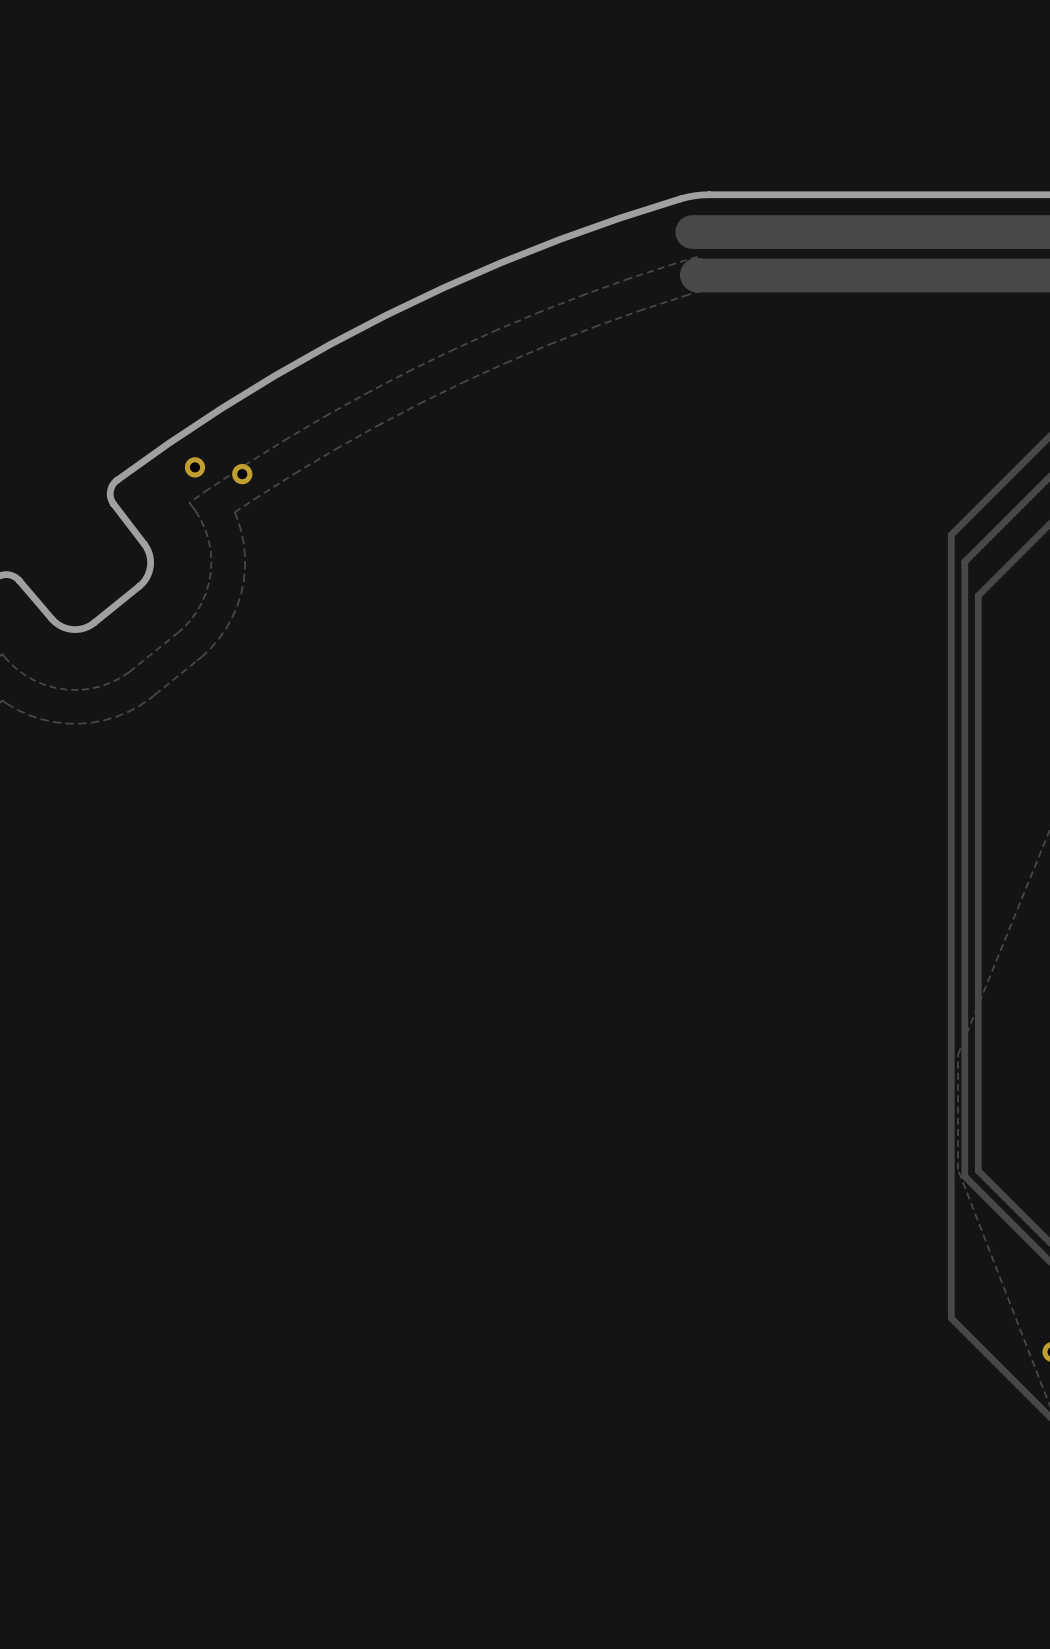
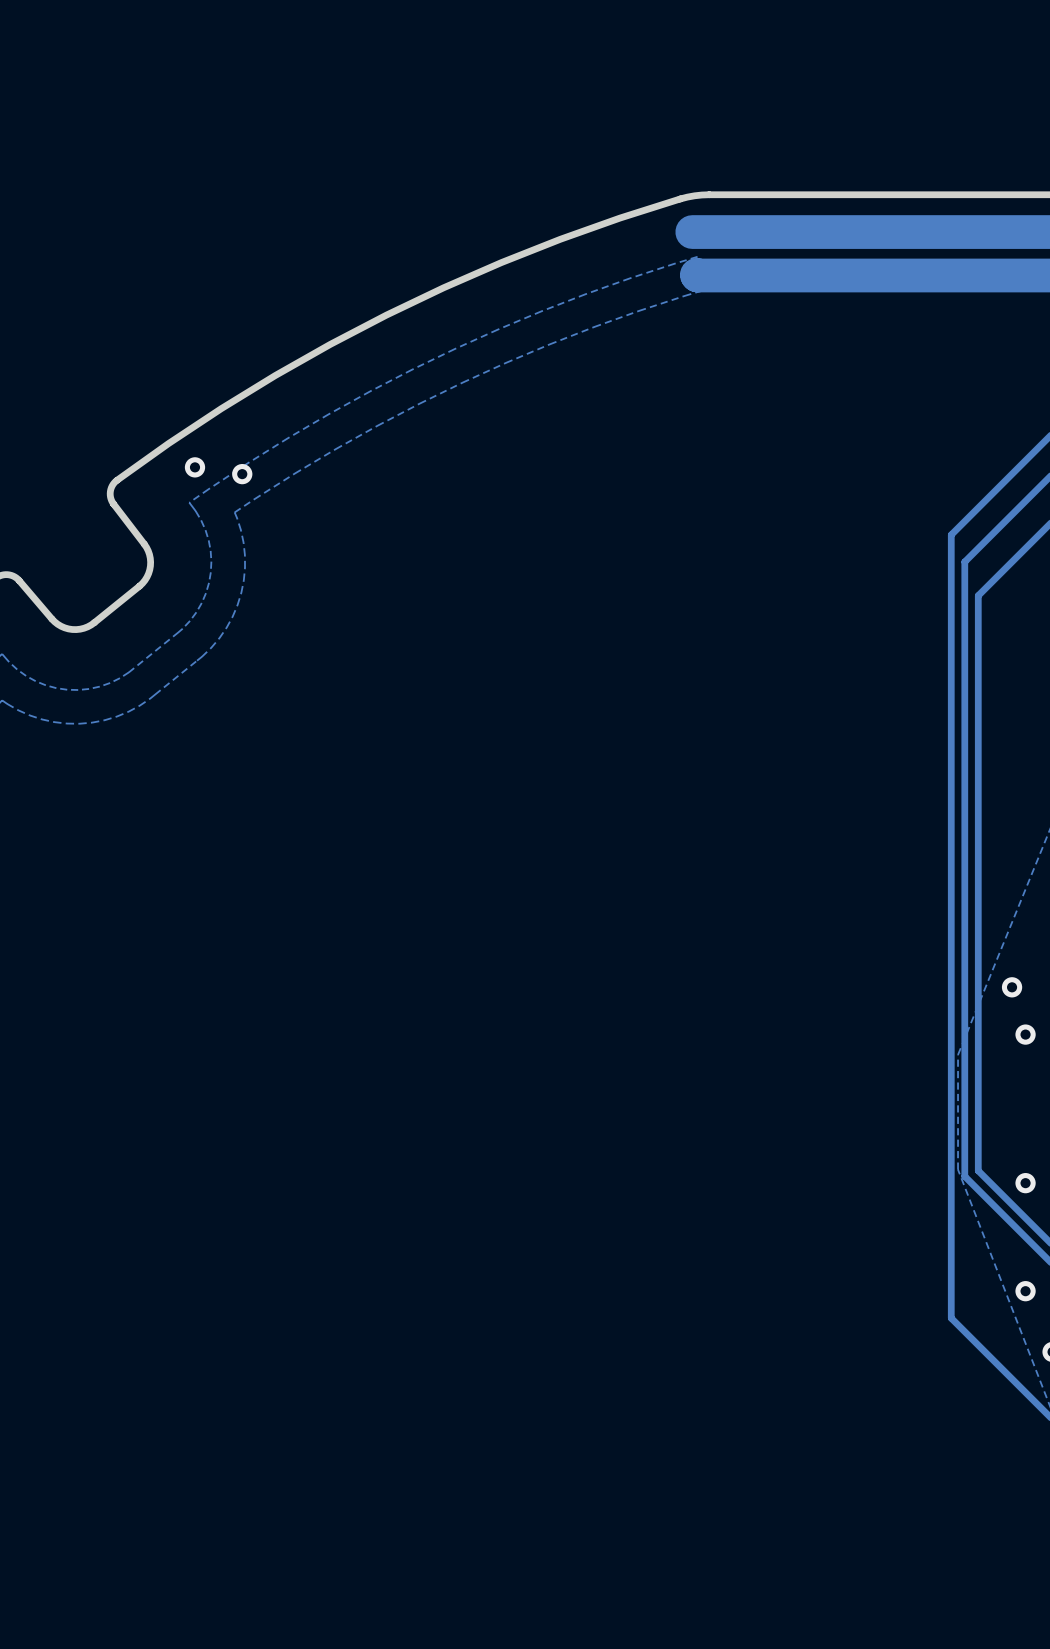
via: none -> (1012, 987)
via: none -> (1025, 1034)
via: none -> (1025, 1183)
via: none -> (1025, 1291)

